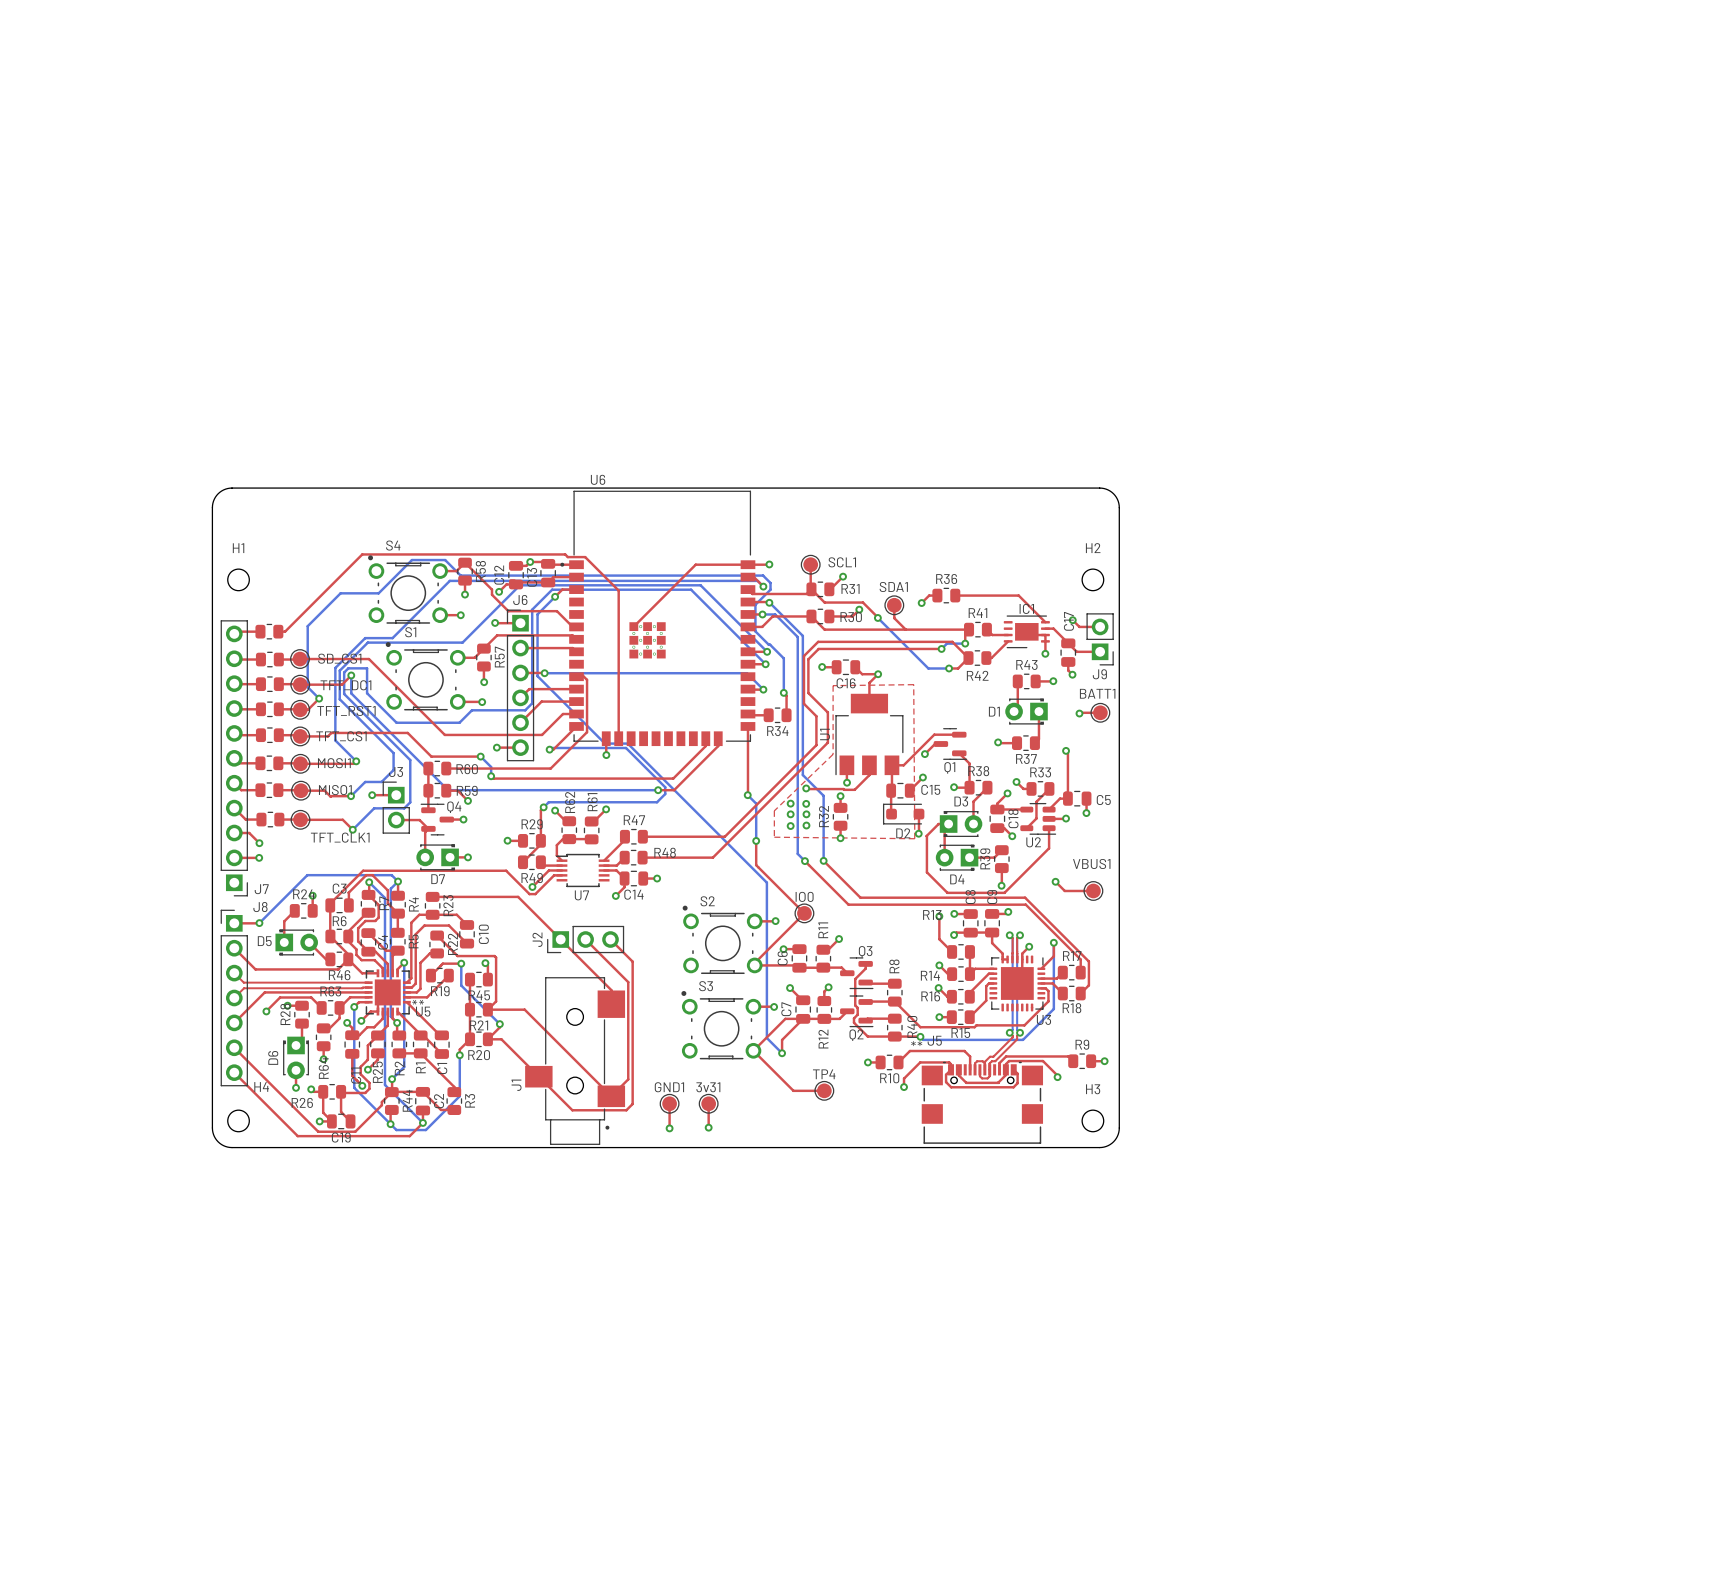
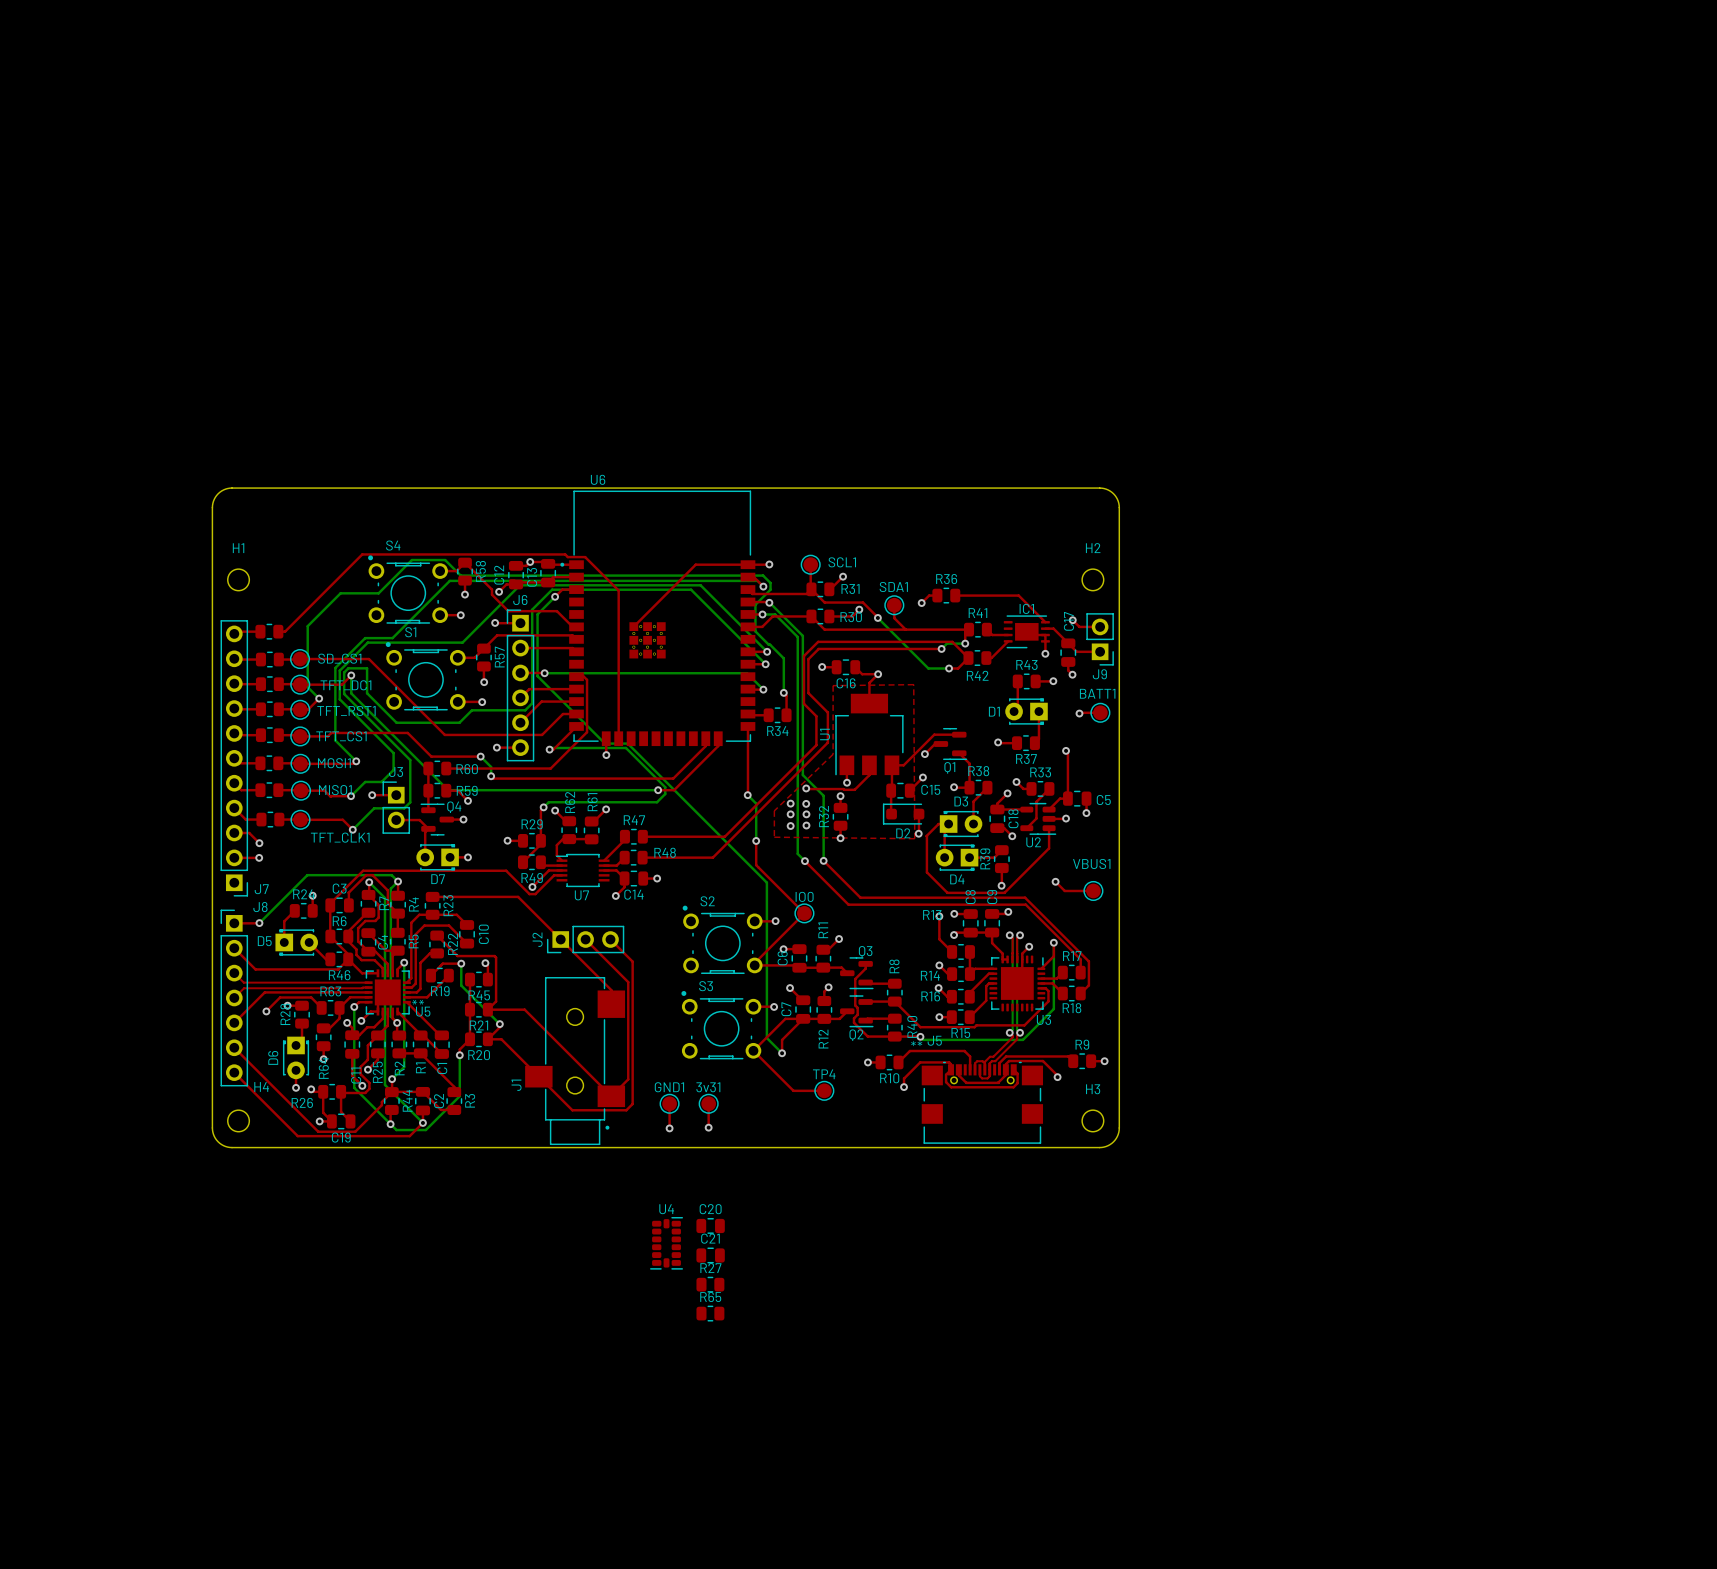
C20: none -> (710, 1225)
U4: none -> (666, 1243)
C21: none -> (710, 1255)
R27: none -> (710, 1284)
R65: none -> (710, 1313)

